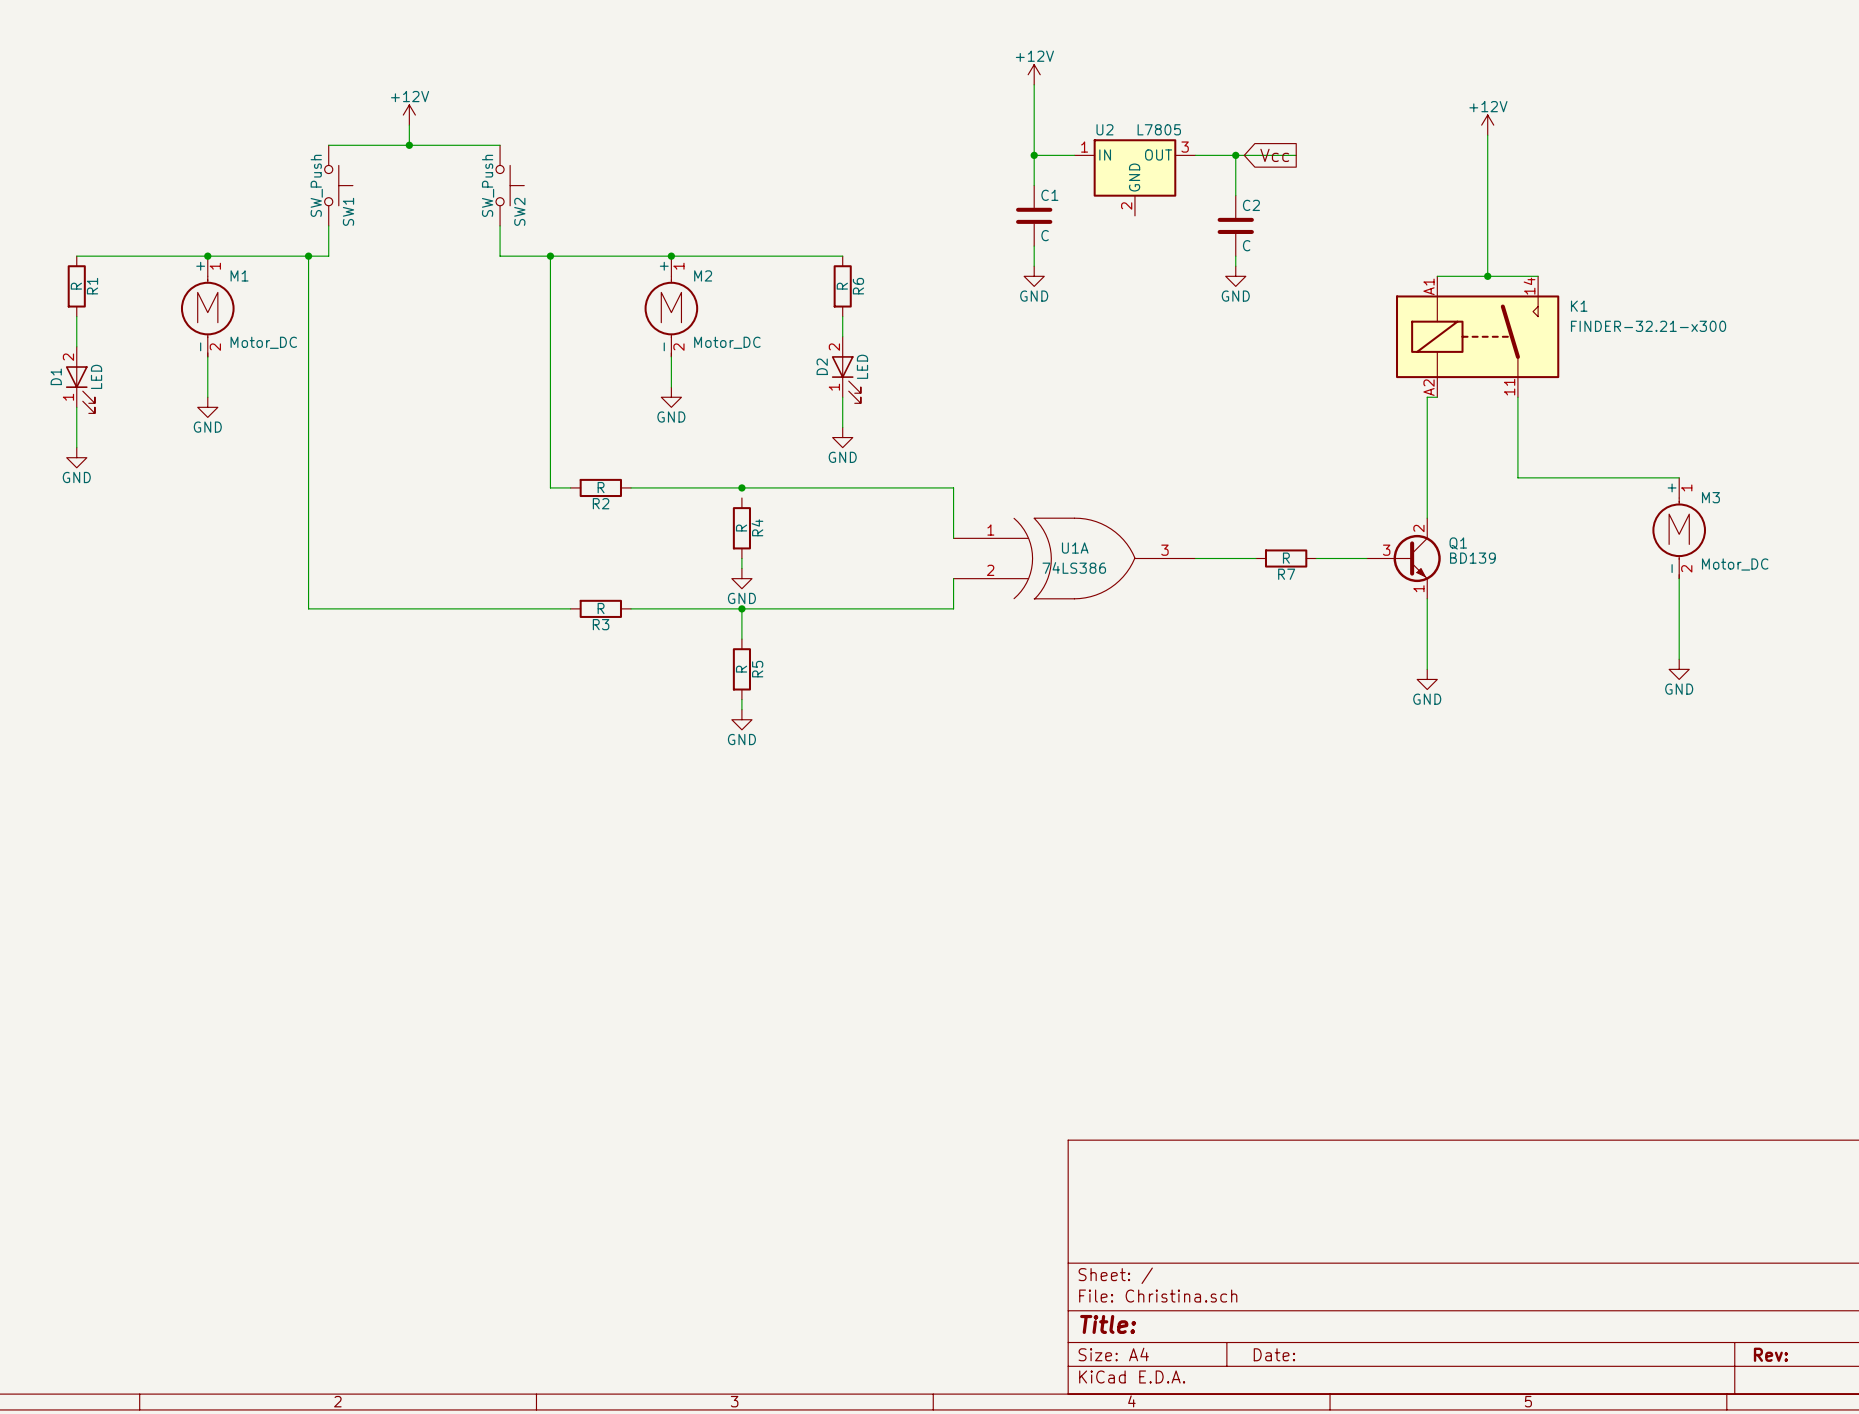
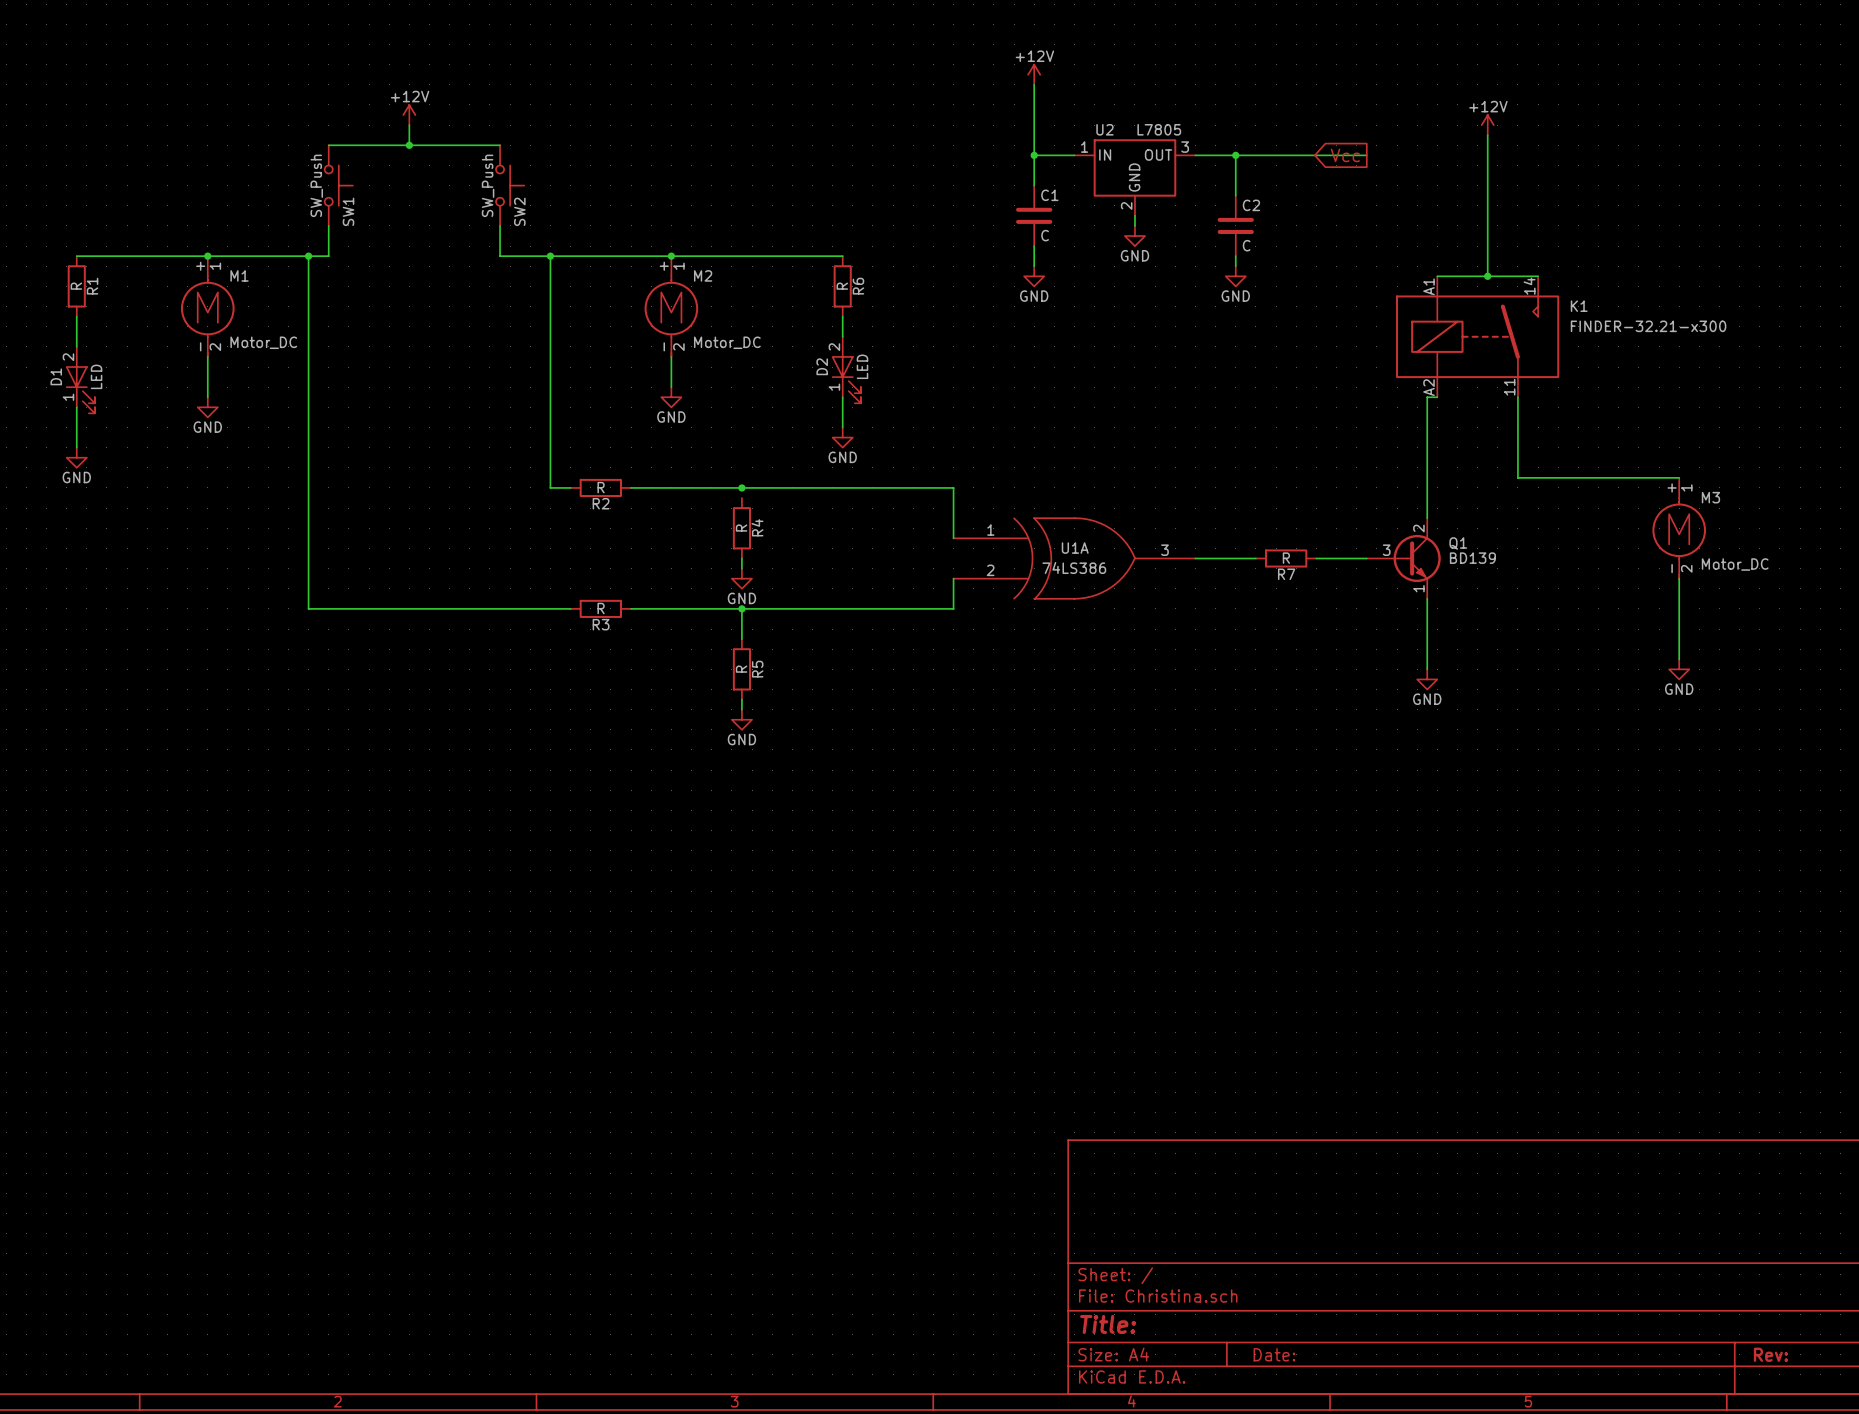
global label position: Vcc (1274, 155) -> Vcc (1345, 155)
wire: none -> (1296, 155) (1366, 155)
wire: none -> (1134, 215) (1134, 225)
power symbol: none -> GND (1134, 236)

